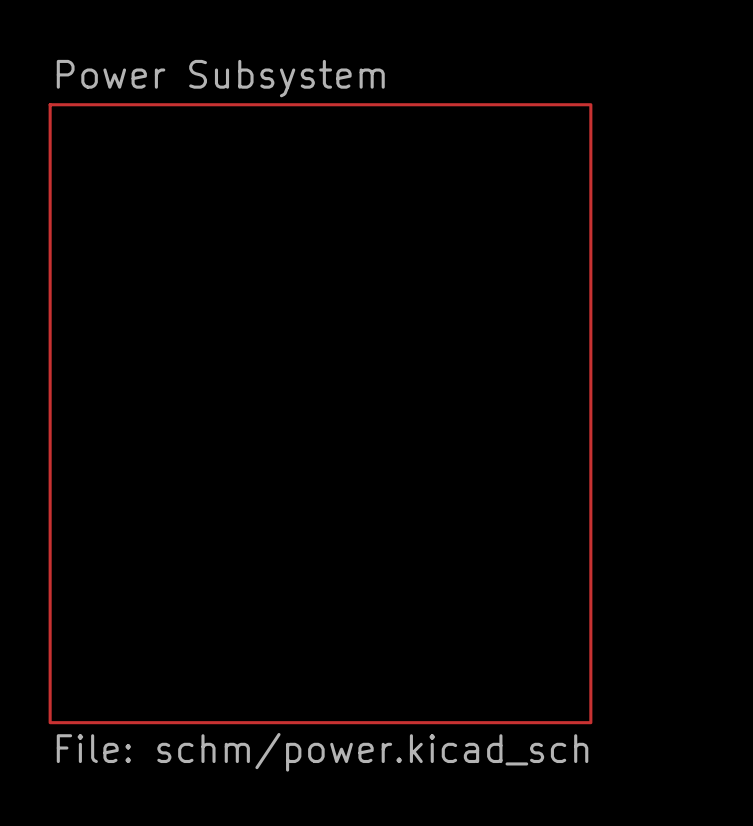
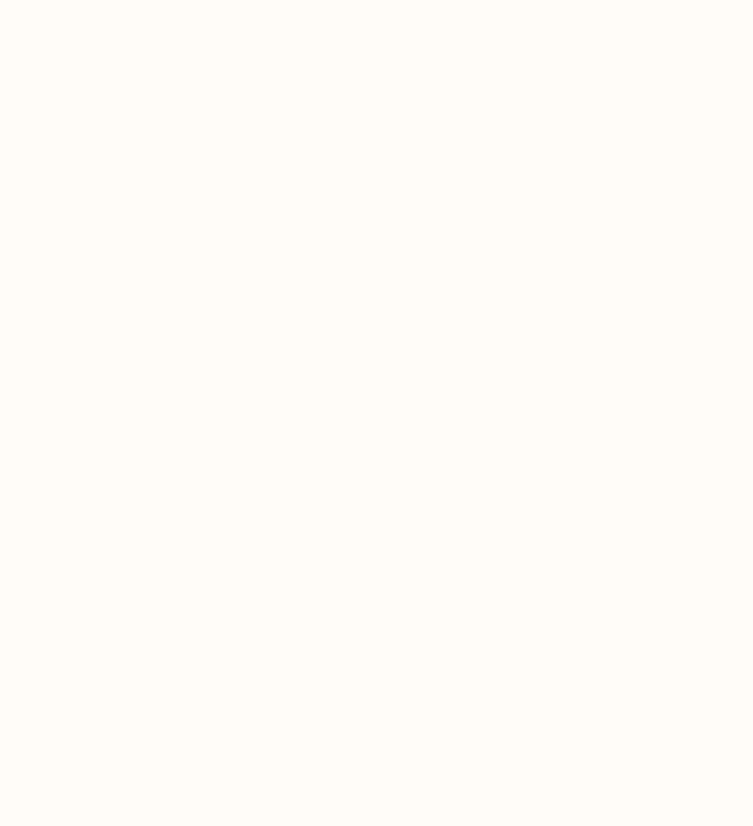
sheet Power Subsystem: File: schm/power.kicad_sch (320, 413) -> none

